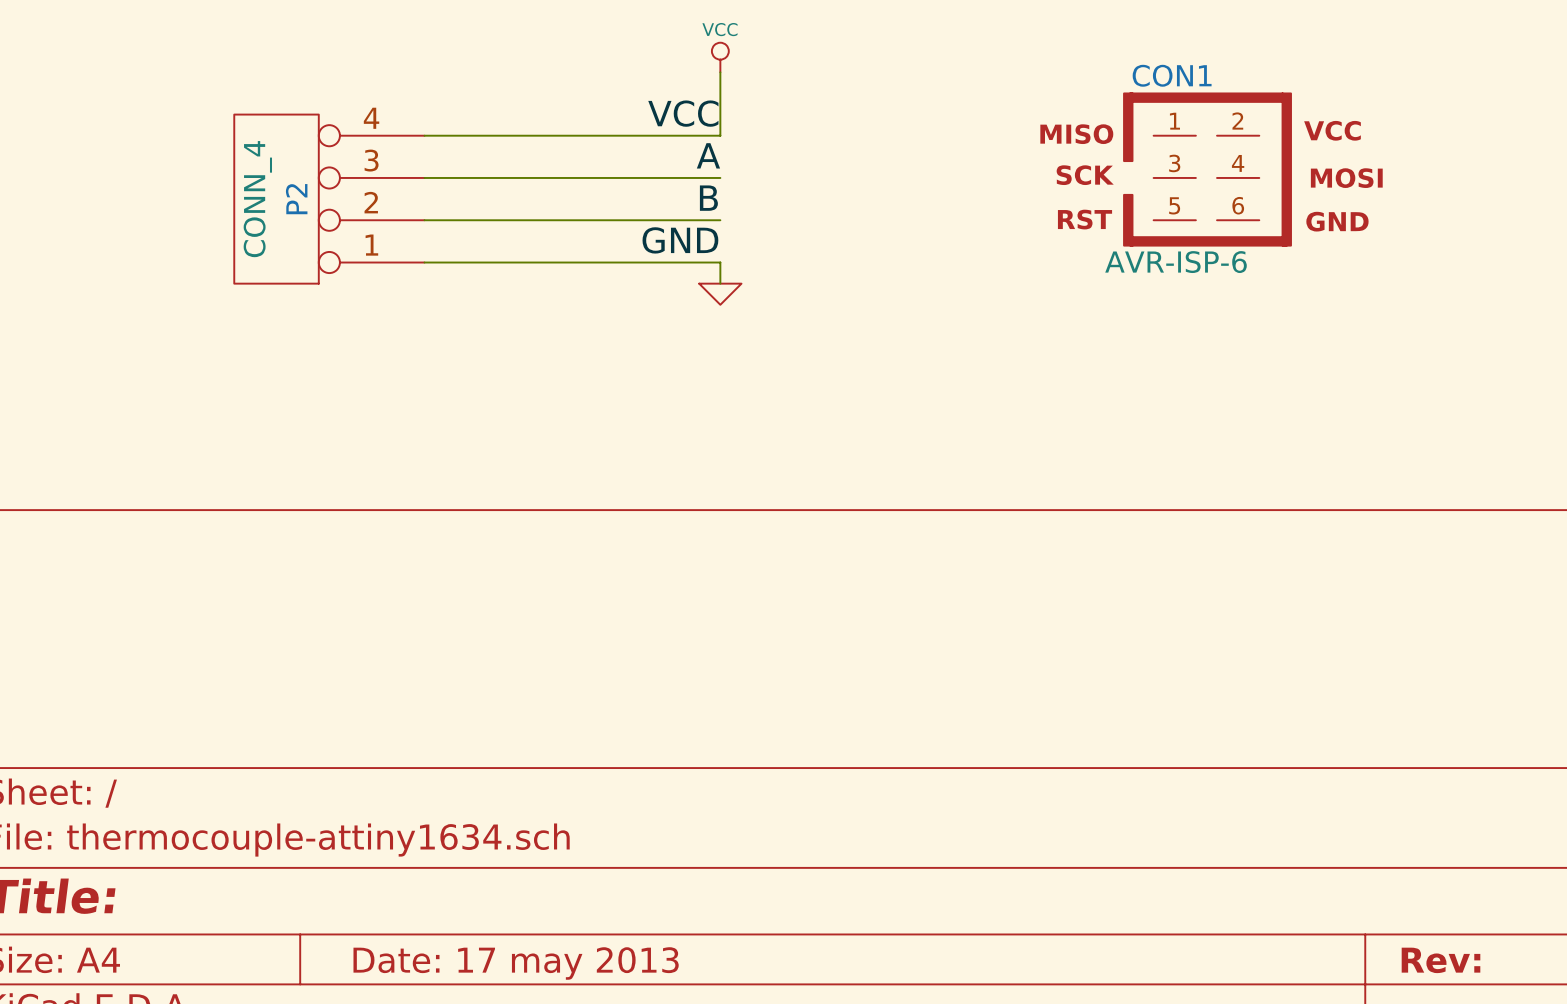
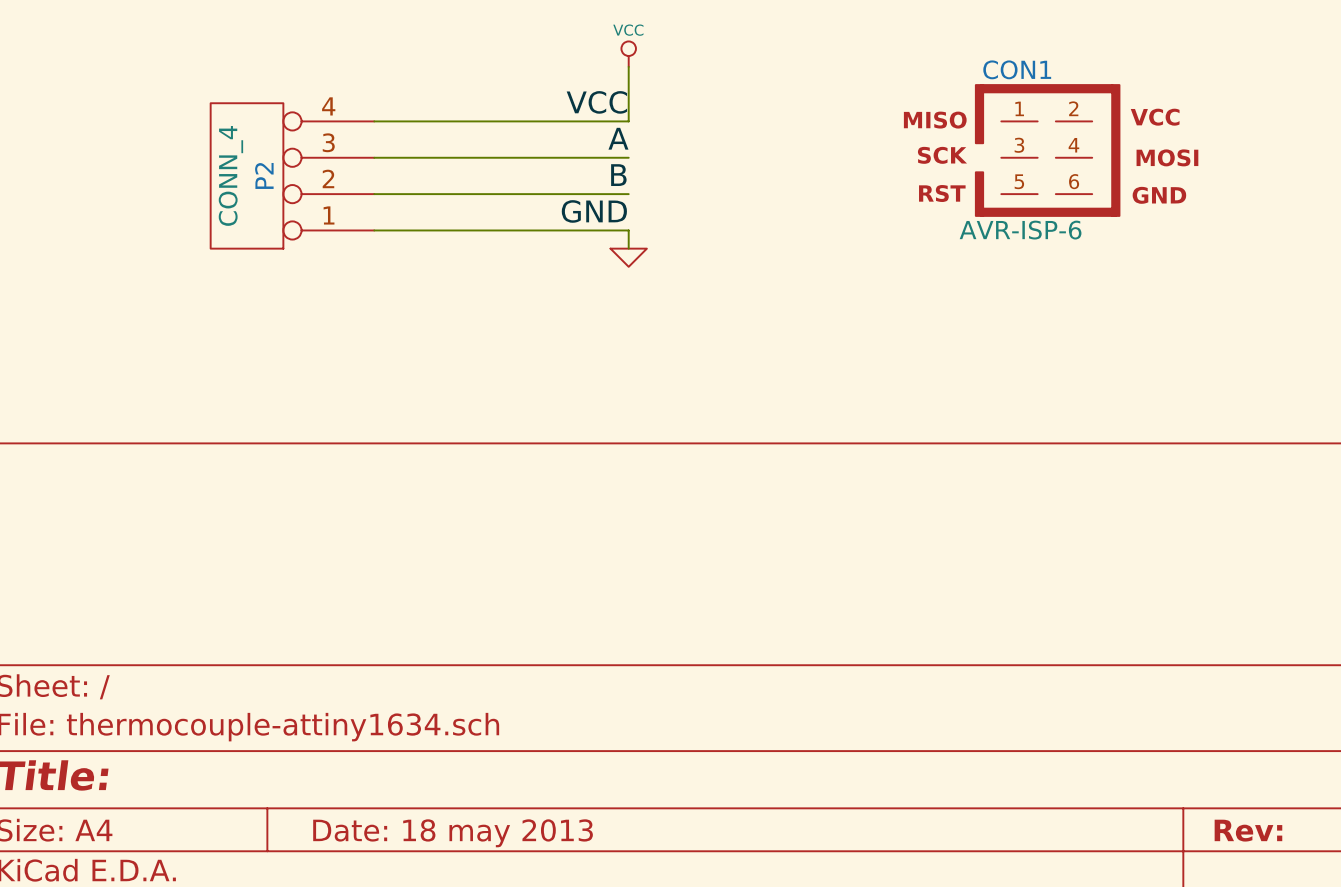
title block: Date: 17 may 2013 (516, 963) -> Date: 18 may 2013 (453, 833)

